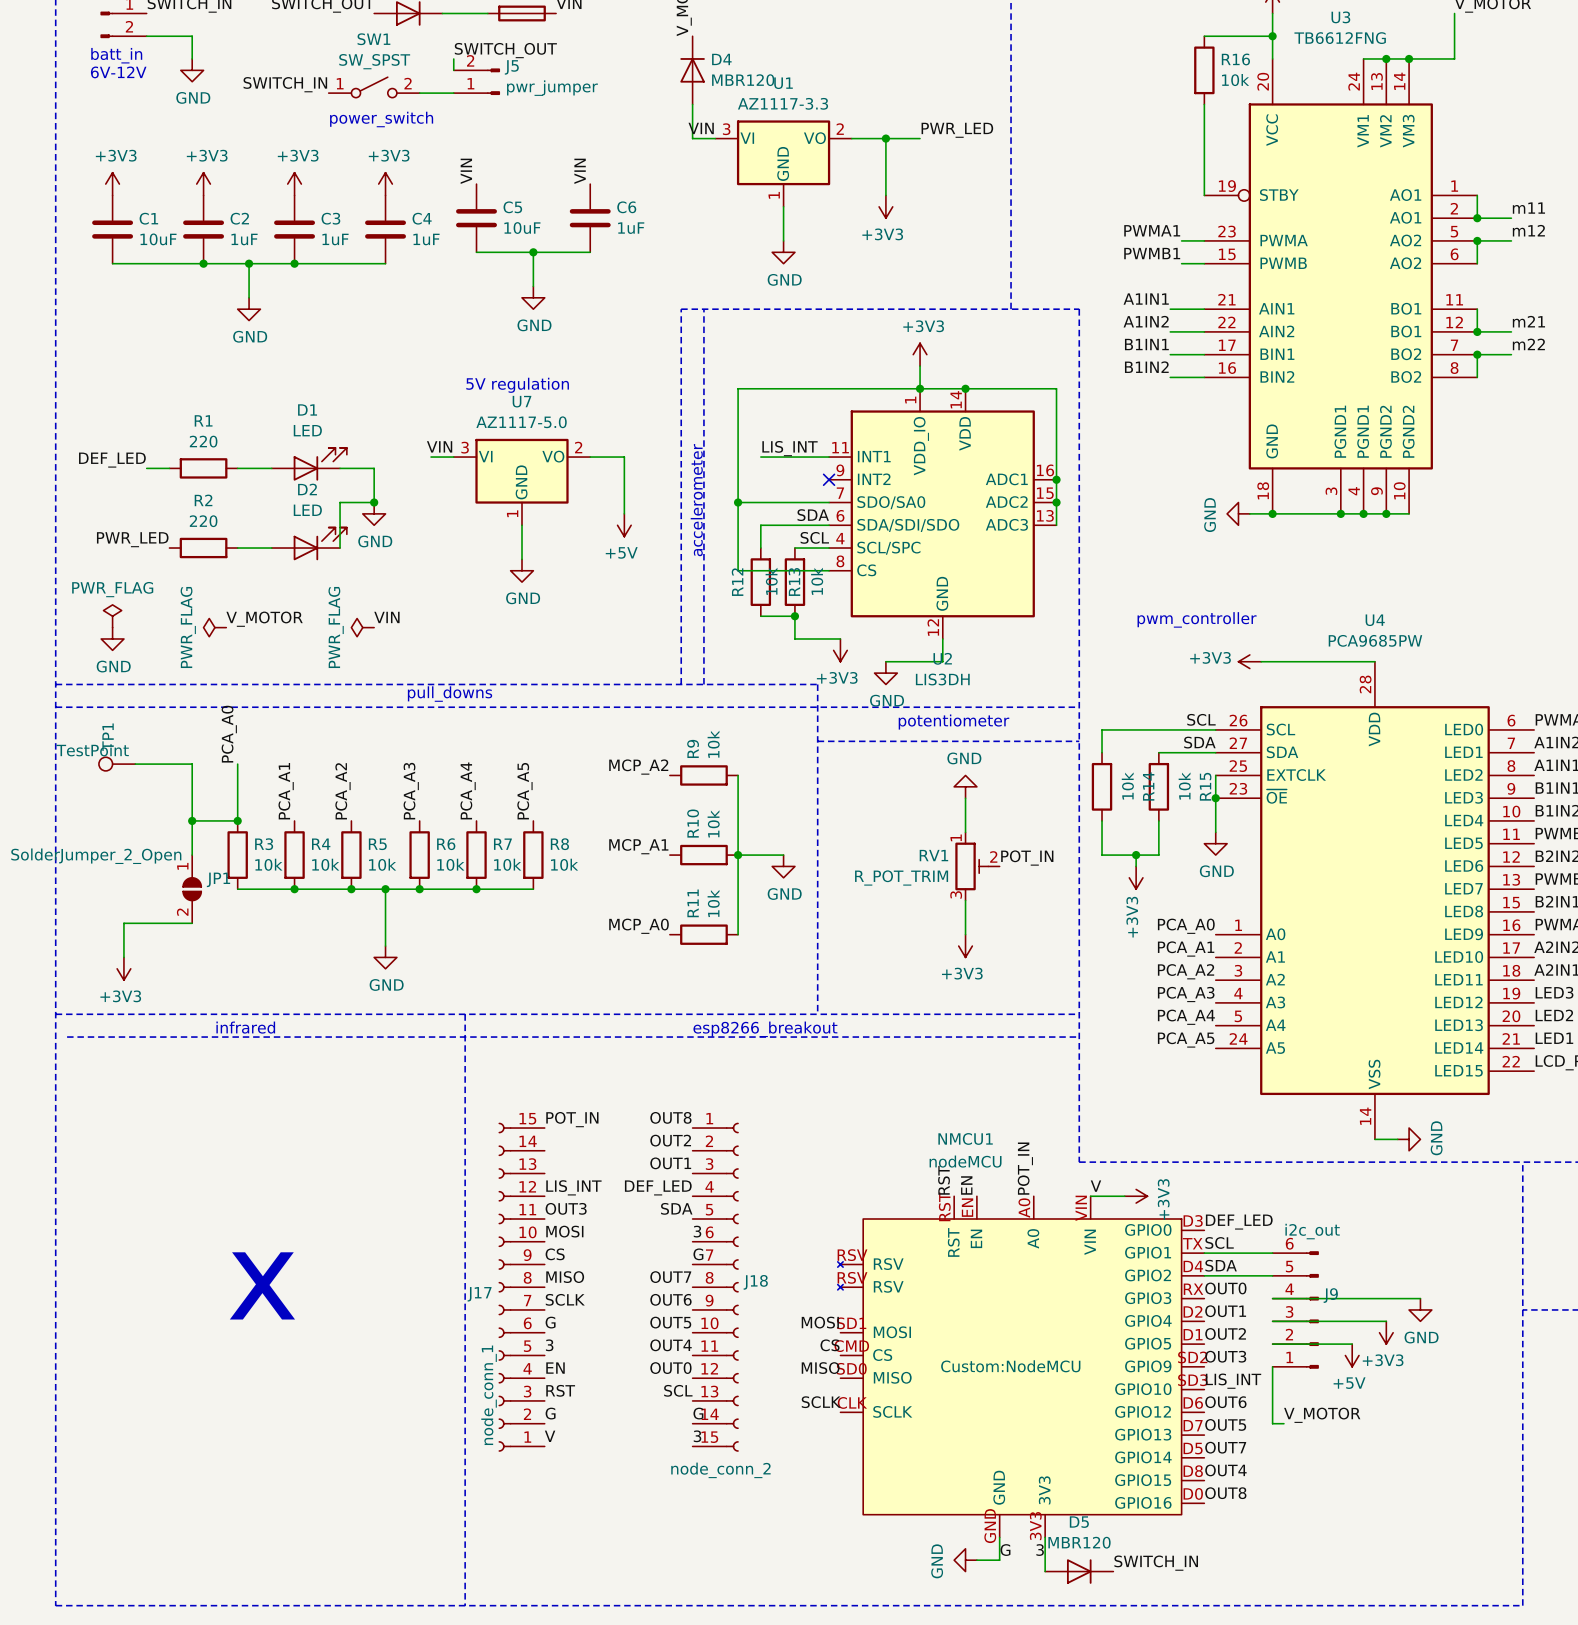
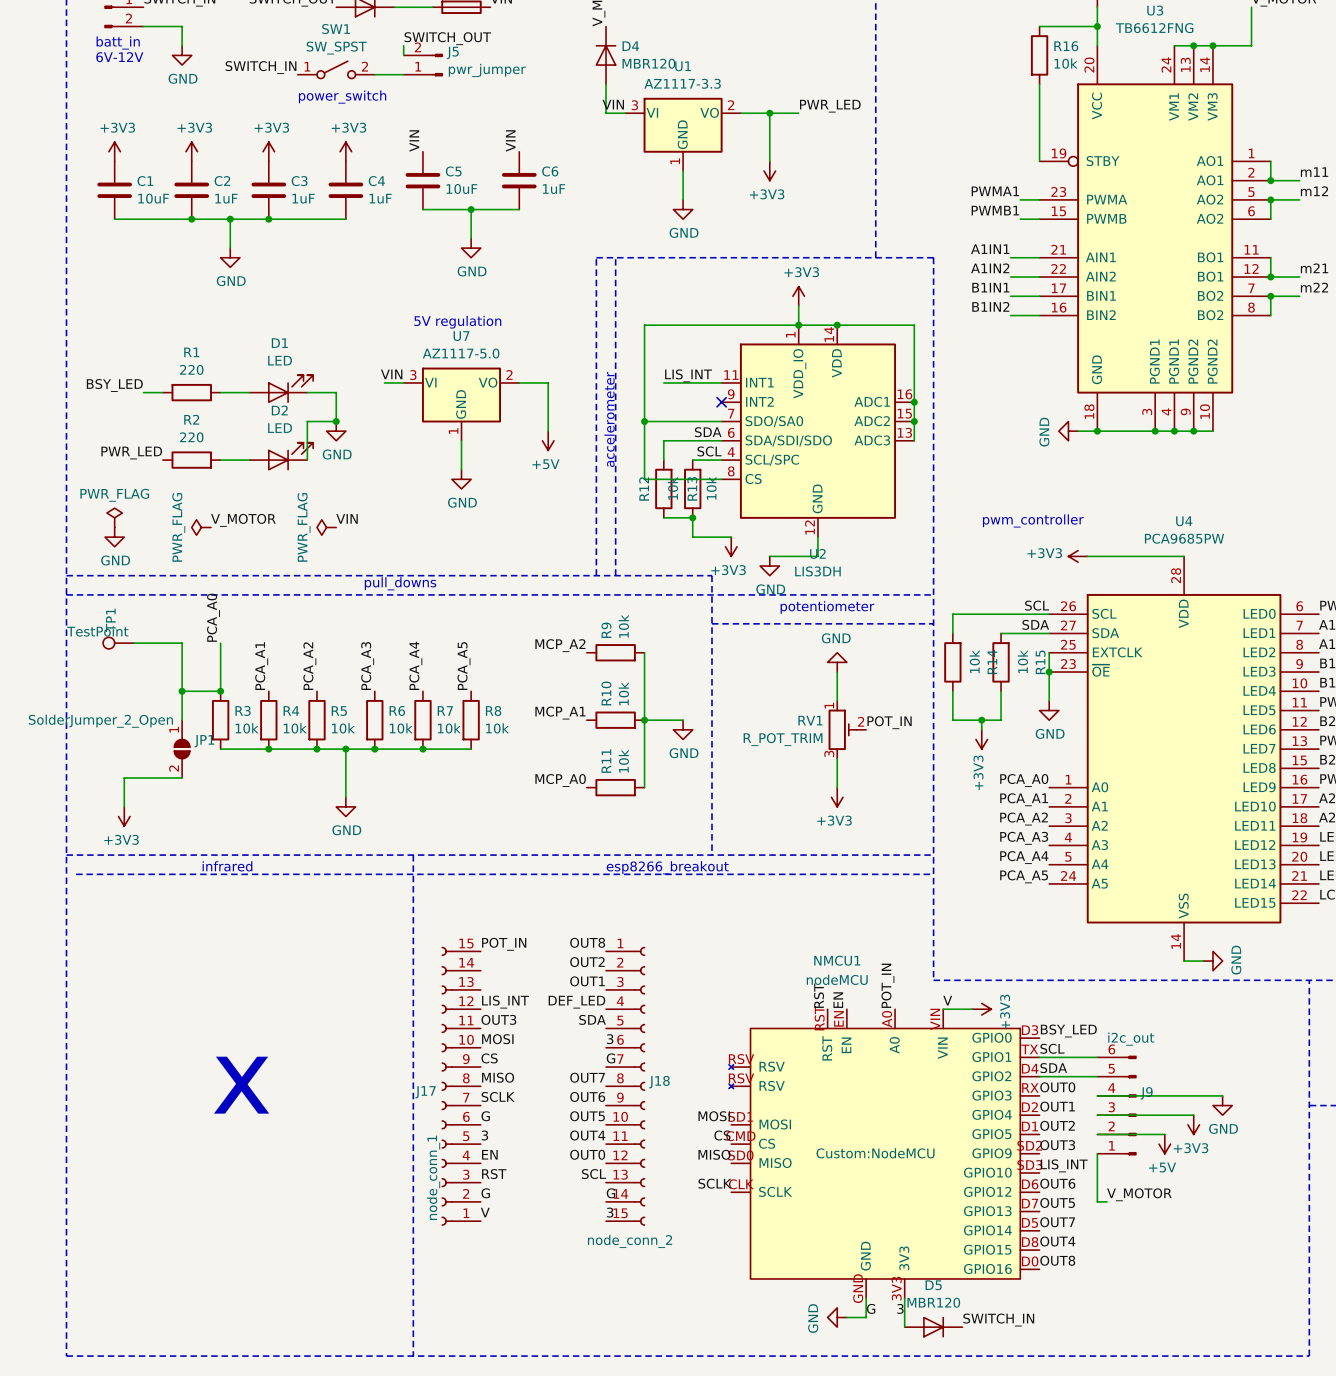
label: DEF_LED (112, 460) -> BSY_LED (114, 385)
label: DEF_LED (1239, 1222) -> BSY_LED (1068, 1031)

